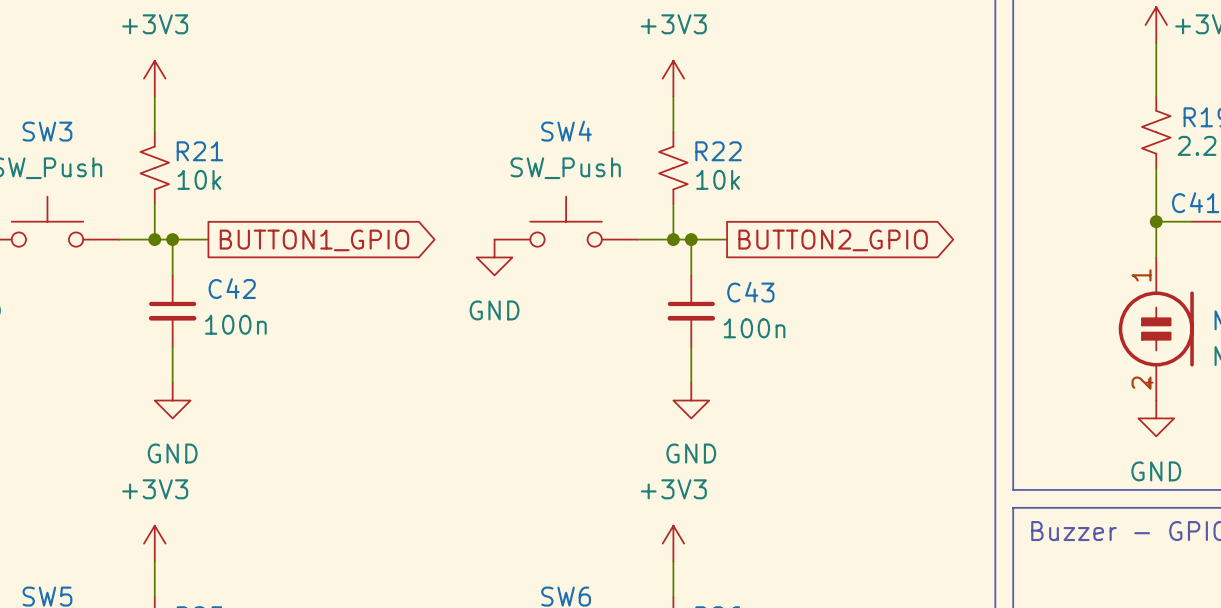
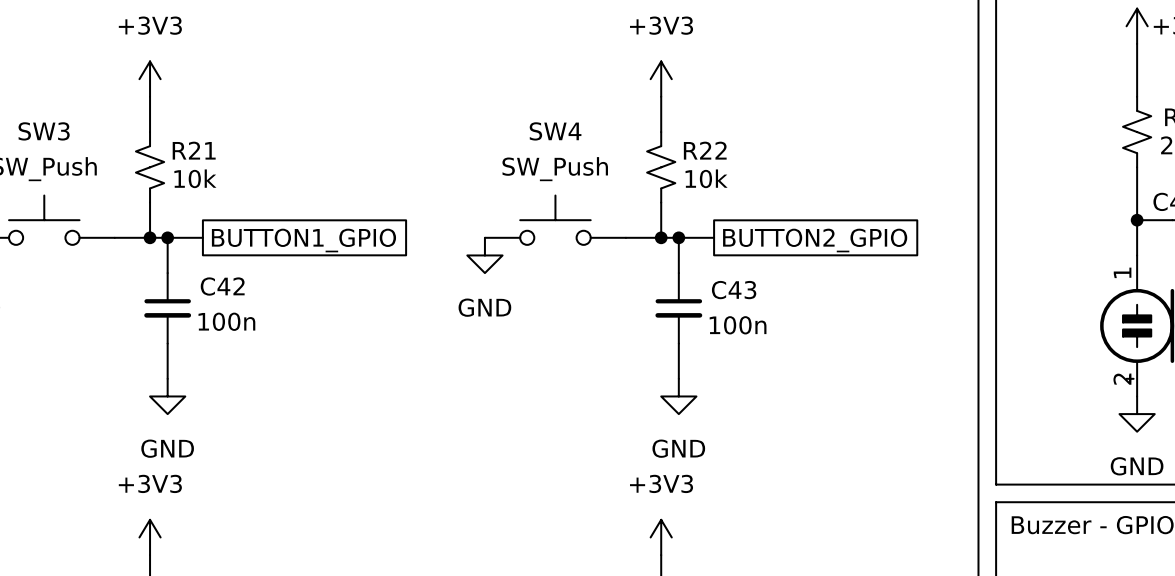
global label shape: output (314, 240) -> passive (303, 240)
global label shape: output (833, 240) -> passive (815, 240)

